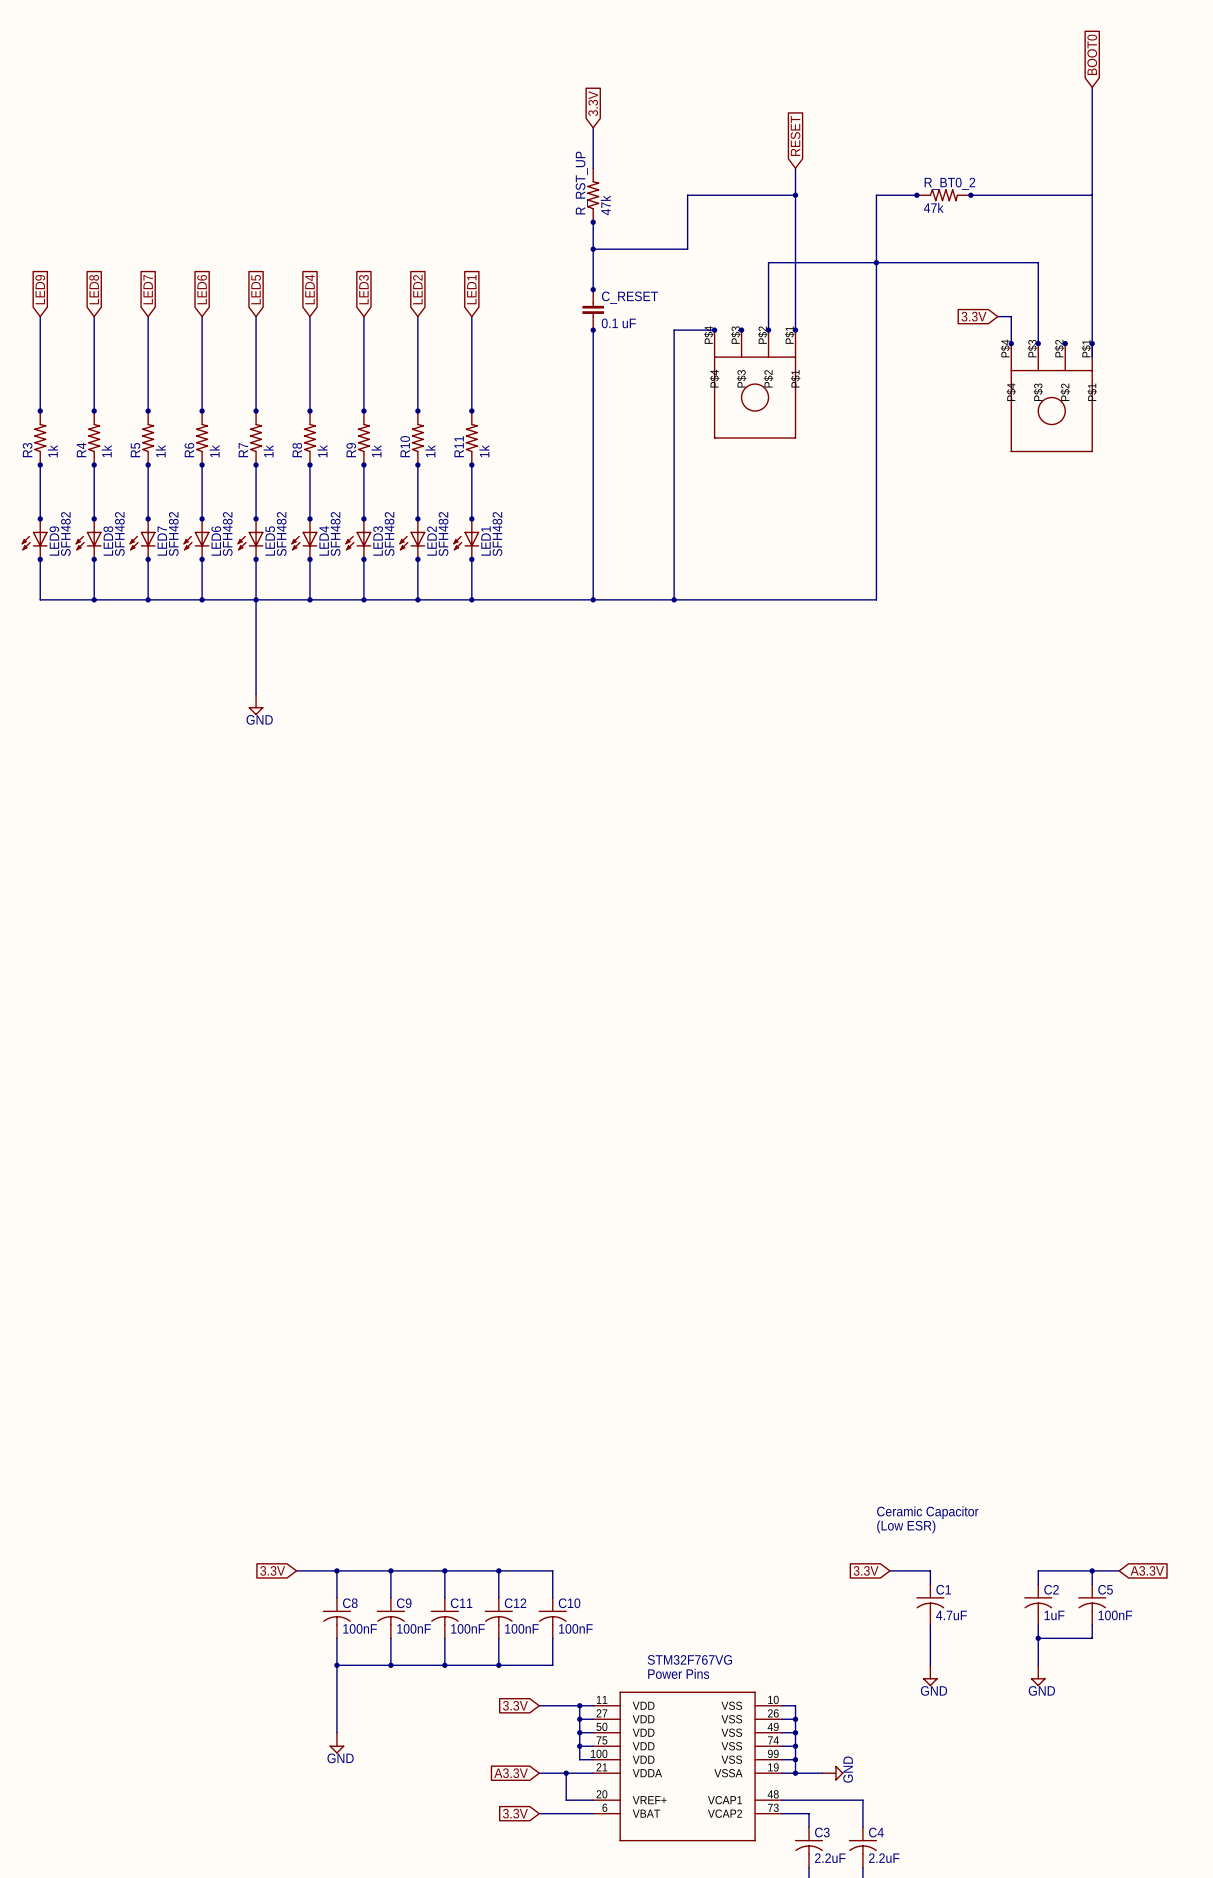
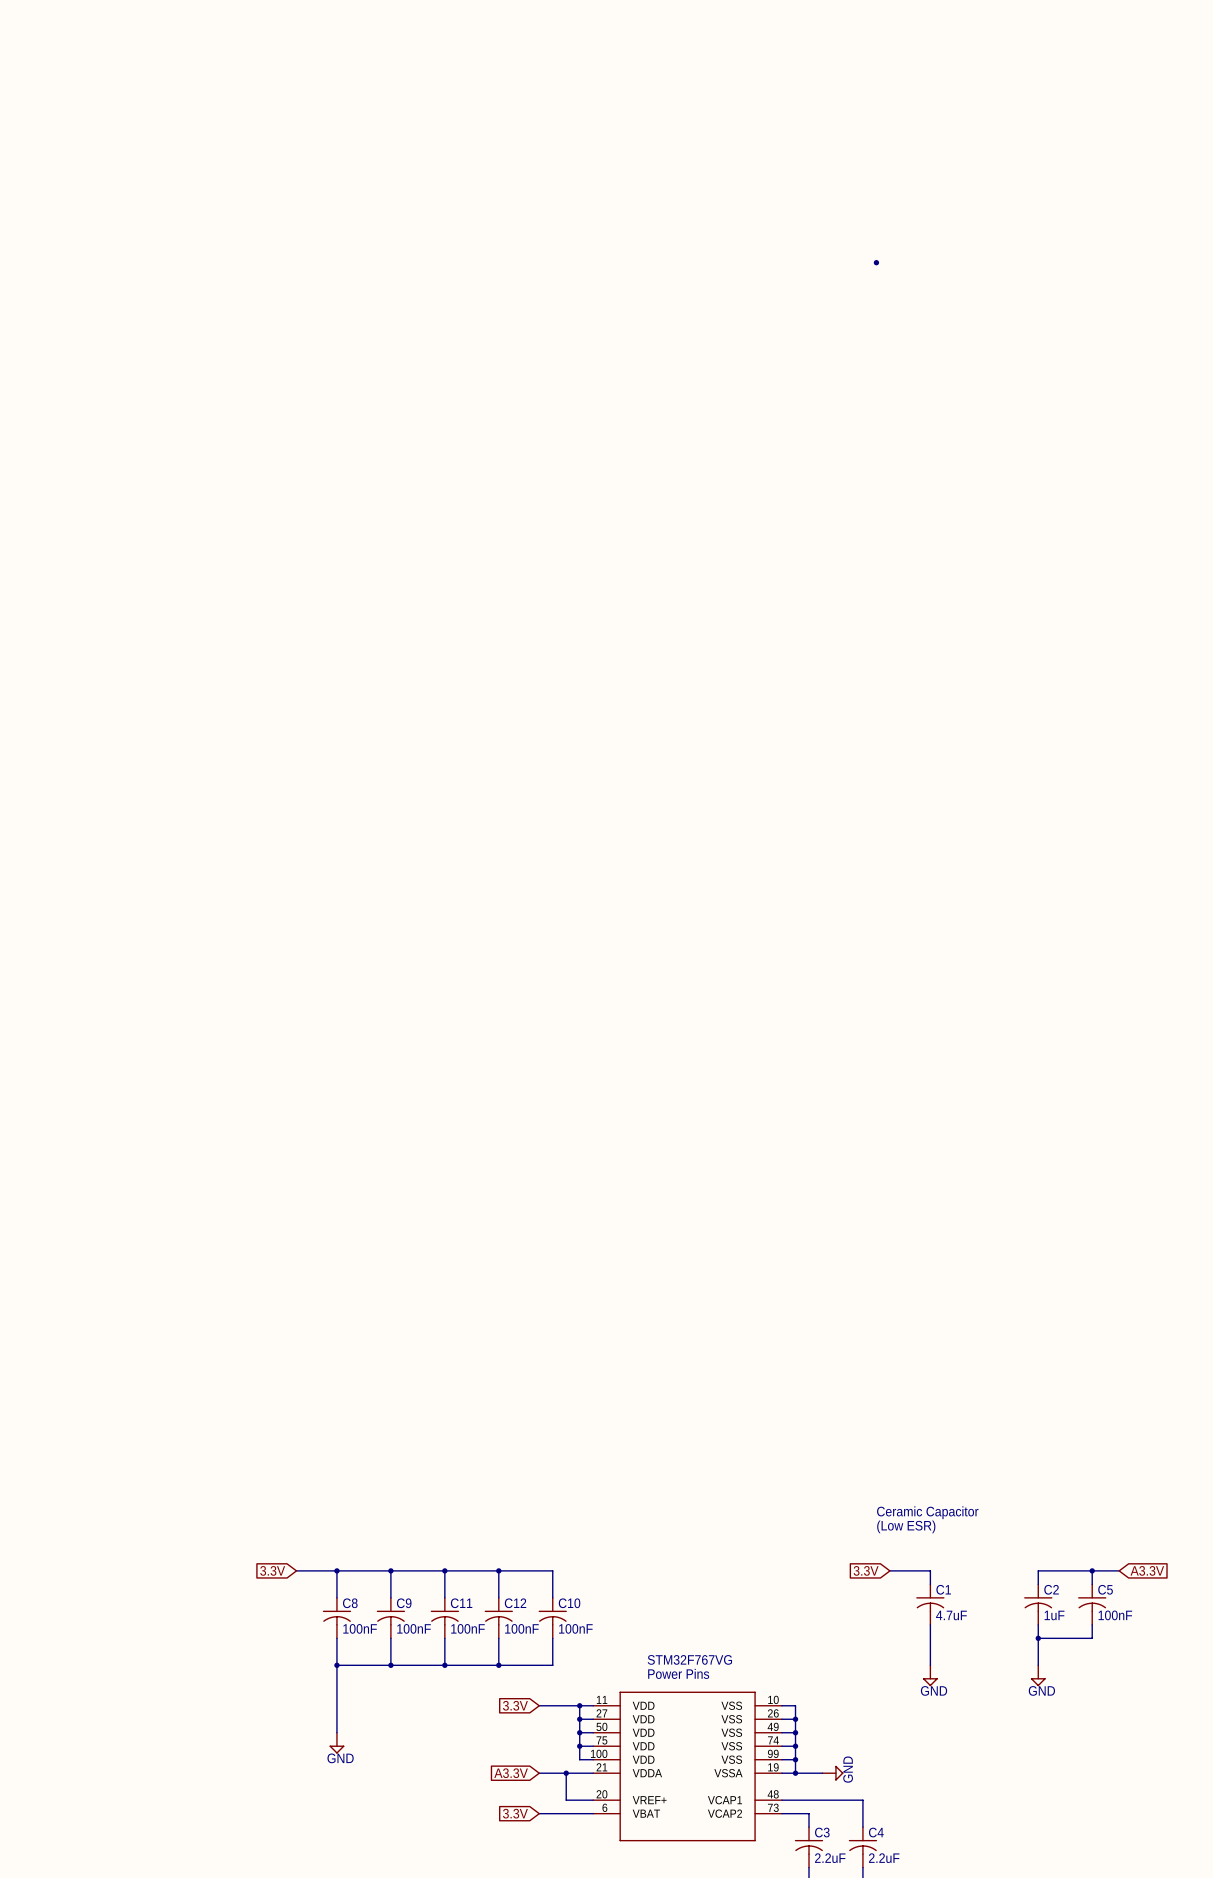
global label: BOOT0 (1092, 54) -> none
wire: (1092, 87) (1092, 357) -> none
global label: 3.3V (593, 103) -> none
wire: (593, 127) (593, 168) -> none
global label: RESET (795, 135) -> none
wire: (795, 168) (795, 330) -> none
R_RST_UP: 47k (593, 195) -> none
wire: (795, 195) (687, 195) (687, 249) (593, 249) -> none
junction: (795, 195) -> none
wire: (916, 195) (876, 195) (876, 599) (40, 599) (40, 559) -> none
junction: (916, 195) -> none
R_BT0_2: 47k (943, 195) -> none
wire: (970, 195) (1092, 195) -> none
junction: (970, 195) -> none
wire: (593, 222) (593, 289) -> none
junction: (593, 222) -> none
junction: (593, 249) -> none
global label: LED9 (40, 289) -> none
global label: LED8 (94, 289) -> none
global label: LED7 (148, 289) -> none
global label: LED6 (202, 289) -> none
global label: LED5 (256, 289) -> none
global label: LED4 (309, 289) -> none
global label: LED3 (363, 289) -> none
global label: LED2 (417, 289) -> none
global label: LED1 (471, 289) -> none
junction: (593, 289) -> none
C_RESET: 0.1 uF (593, 309) -> none
wire: (40, 316) (40, 411) -> none
wire: (94, 316) (94, 411) -> none
wire: (148, 316) (148, 411) -> none
wire: (202, 316) (202, 411) -> none
wire: (256, 316) (256, 411) -> none
wire: (309, 316) (309, 411) -> none
wire: (363, 316) (363, 411) -> none
wire: (417, 316) (417, 411) -> none
wire: (471, 316) (471, 411) -> none
global label: 3.3V (973, 316) -> none
wire: (997, 316) (1011, 316) (1011, 343) -> none
wire: (593, 330) (593, 599) -> none
junction: (593, 330) -> none
wire: (714, 330) (674, 330) (674, 599) -> none
junction: (714, 330) -> none
junction: (741, 330) -> none
wire: (768, 330) (768, 262) (1038, 262) (1038, 343) -> none
junction: (768, 330) -> none
junction: (795, 330) -> none
junction: (1011, 343) -> none
junction: (1038, 343) -> none
junction: (1065, 343) -> none
junction: (1092, 343) -> none
part: (755, 384) -> none
part: (1051, 397) -> none
junction: (40, 411) -> none
junction: (94, 411) -> none
junction: (148, 411) -> none
junction: (202, 411) -> none
junction: (256, 411) -> none
junction: (309, 411) -> none
junction: (363, 411) -> none
junction: (417, 411) -> none
junction: (471, 411) -> none
R3: 1k (40, 438) -> none
R4: 1k (94, 438) -> none
R5: 1k (148, 438) -> none
R6: 1k (202, 438) -> none
R7: 1k (256, 438) -> none
R8: 1k (309, 438) -> none
R9: 1k (363, 438) -> none
R10: 1k (417, 438) -> none
R11: 1k (471, 438) -> none
wire: (40, 464) (40, 518) -> none
junction: (40, 464) -> none
wire: (94, 464) (94, 518) -> none
junction: (94, 464) -> none
wire: (148, 464) (148, 518) -> none
junction: (148, 464) -> none
wire: (202, 464) (202, 518) -> none
junction: (202, 464) -> none
wire: (256, 464) (256, 518) -> none
junction: (256, 464) -> none
wire: (309, 464) (309, 518) -> none
junction: (309, 464) -> none
wire: (363, 464) (363, 518) -> none
junction: (363, 464) -> none
wire: (417, 464) (417, 518) -> none
junction: (417, 464) -> none
wire: (471, 464) (471, 518) -> none
junction: (471, 464) -> none
junction: (40, 518) -> none
junction: (94, 518) -> none
junction: (148, 518) -> none
junction: (202, 518) -> none
junction: (256, 518) -> none
junction: (309, 518) -> none
junction: (363, 518) -> none
junction: (417, 518) -> none
junction: (471, 518) -> none
LED9: SFH482 (34, 539) -> none
LED8: SFH482 (88, 539) -> none
LED7: SFH482 (142, 539) -> none
LED6: SFH482 (196, 539) -> none
LED5: SFH482 (250, 539) -> none
LED4: SFH482 (304, 539) -> none
LED3: SFH482 (358, 539) -> none
LED2: SFH482 (412, 539) -> none
LED1: SFH482 (466, 539) -> none
junction: (40, 559) -> none
wire: (94, 559) (94, 599) -> none
junction: (94, 559) -> none
wire: (148, 559) (148, 599) -> none
junction: (148, 559) -> none
wire: (202, 559) (202, 599) -> none
junction: (202, 559) -> none
wire: (256, 559) (256, 694) -> none
junction: (256, 559) -> none
wire: (309, 559) (309, 599) -> none
junction: (309, 559) -> none
wire: (363, 559) (363, 599) -> none
junction: (363, 559) -> none
wire: (417, 559) (417, 599) -> none
junction: (417, 559) -> none
wire: (471, 559) (471, 599) -> none
junction: (471, 559) -> none
junction: (94, 599) -> none
junction: (148, 599) -> none
junction: (202, 599) -> none
junction: (256, 599) -> none
junction: (309, 599) -> none
junction: (363, 599) -> none
junction: (417, 599) -> none
junction: (471, 599) -> none
junction: (593, 599) -> none
junction: (674, 599) -> none
power symbol: GND (256, 704) -> none

